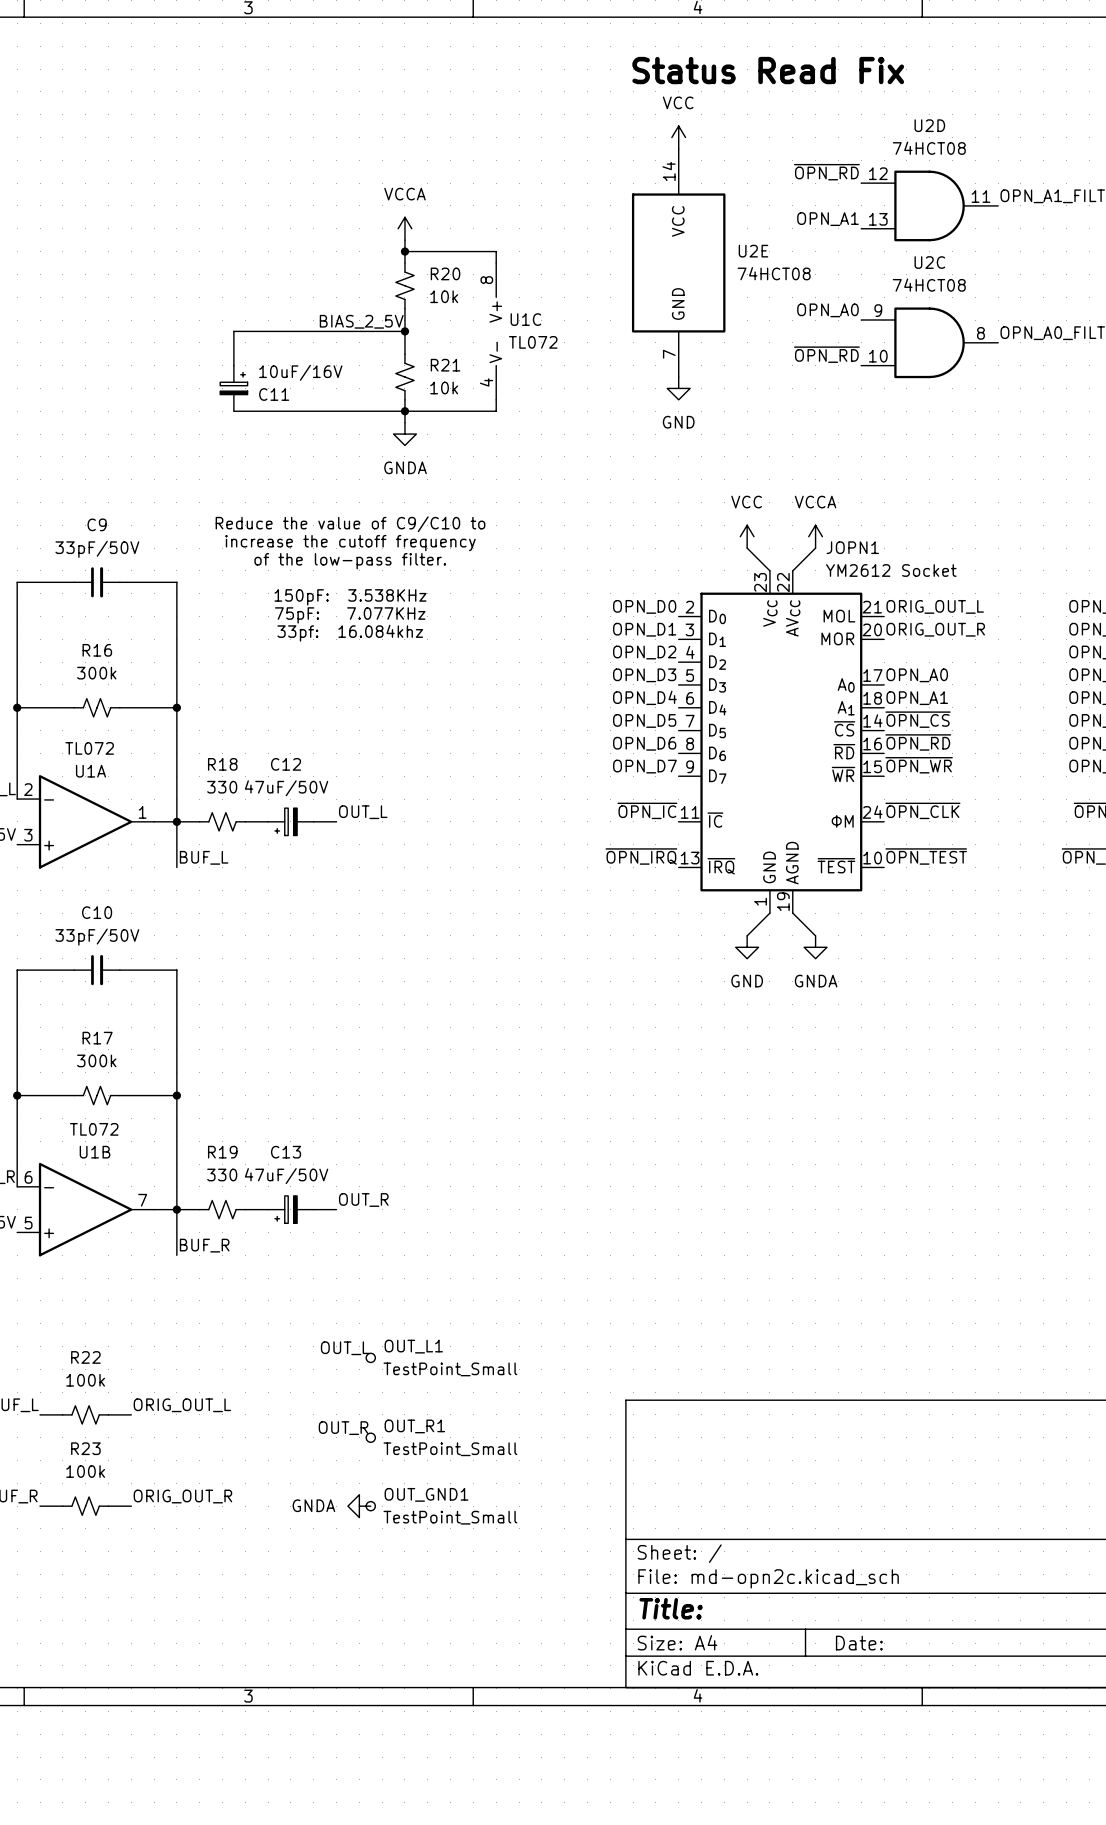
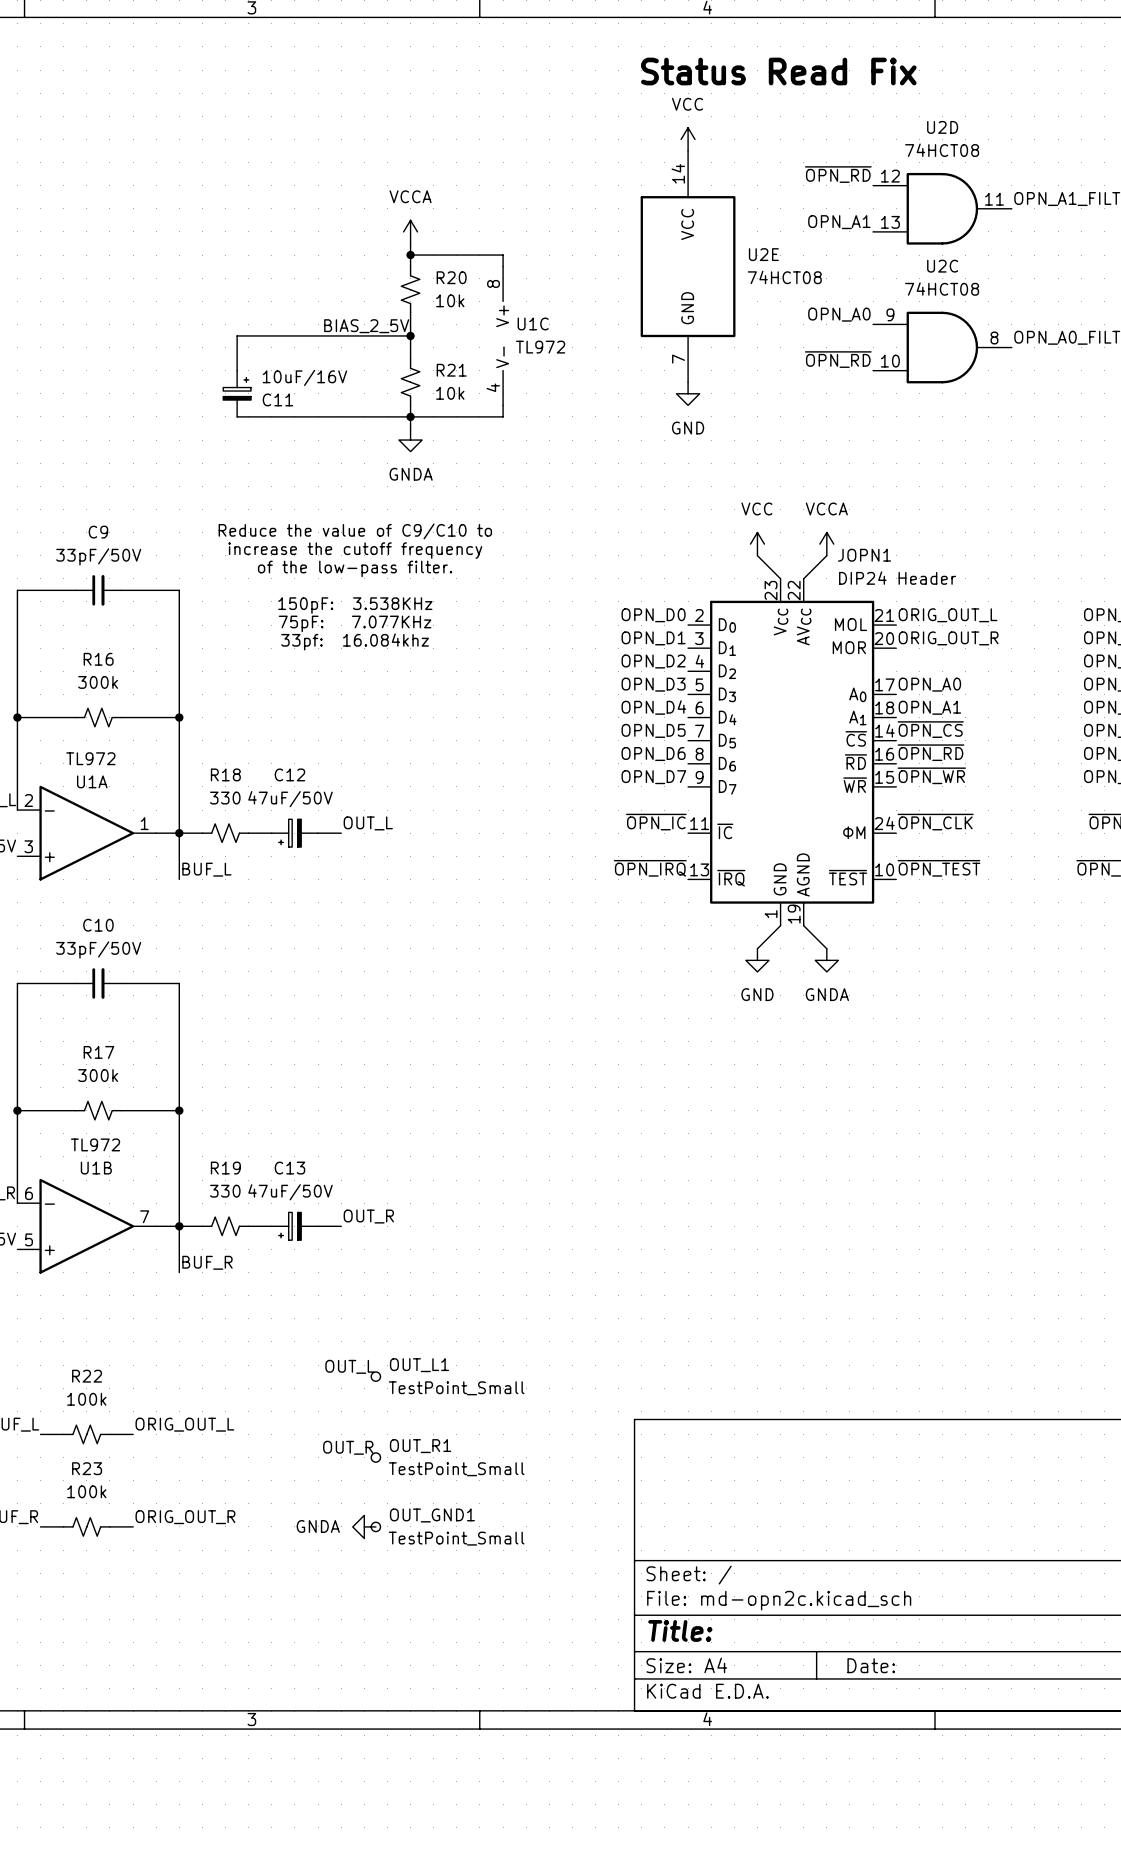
U1C value: TL072 (533, 342) -> TL972 (540, 347)
JOPN1 value: YM2612 Socket (891, 570) -> DIP24 Header (897, 578)
U1A value: TL072 (89, 748) -> TL972 (90, 758)
U1B value: TL072 (94, 1129) -> TL972 (95, 1144)

